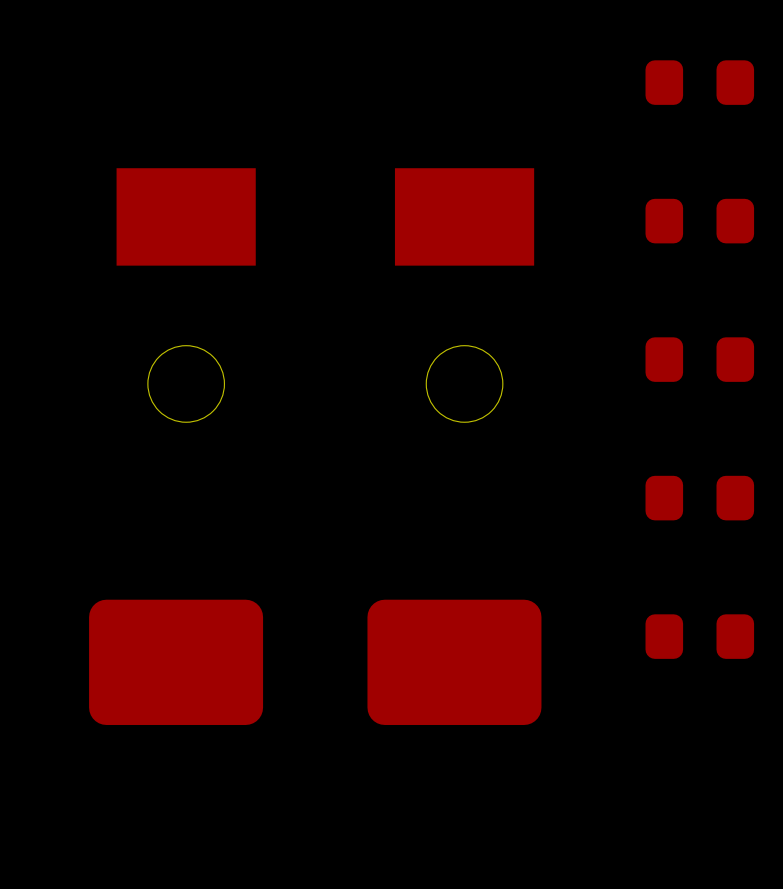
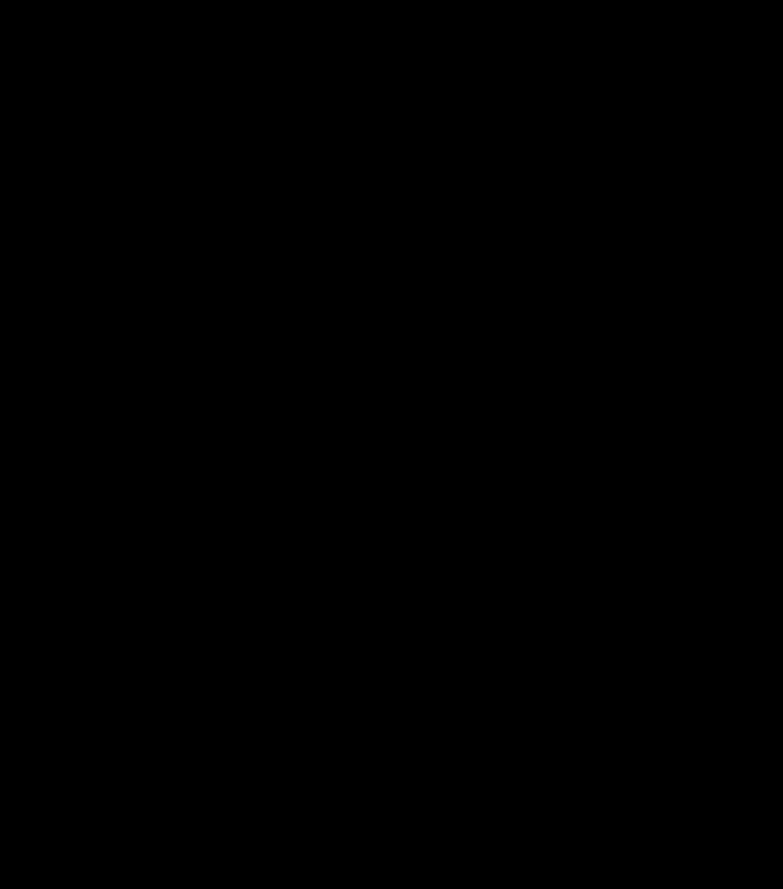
part: (699, 82) -> none
part: (699, 221) -> none
part: (325, 295) -> none
part: (699, 359) -> none
part: (699, 498) -> none
part: (699, 636) -> none
part: (315, 662) -> none

